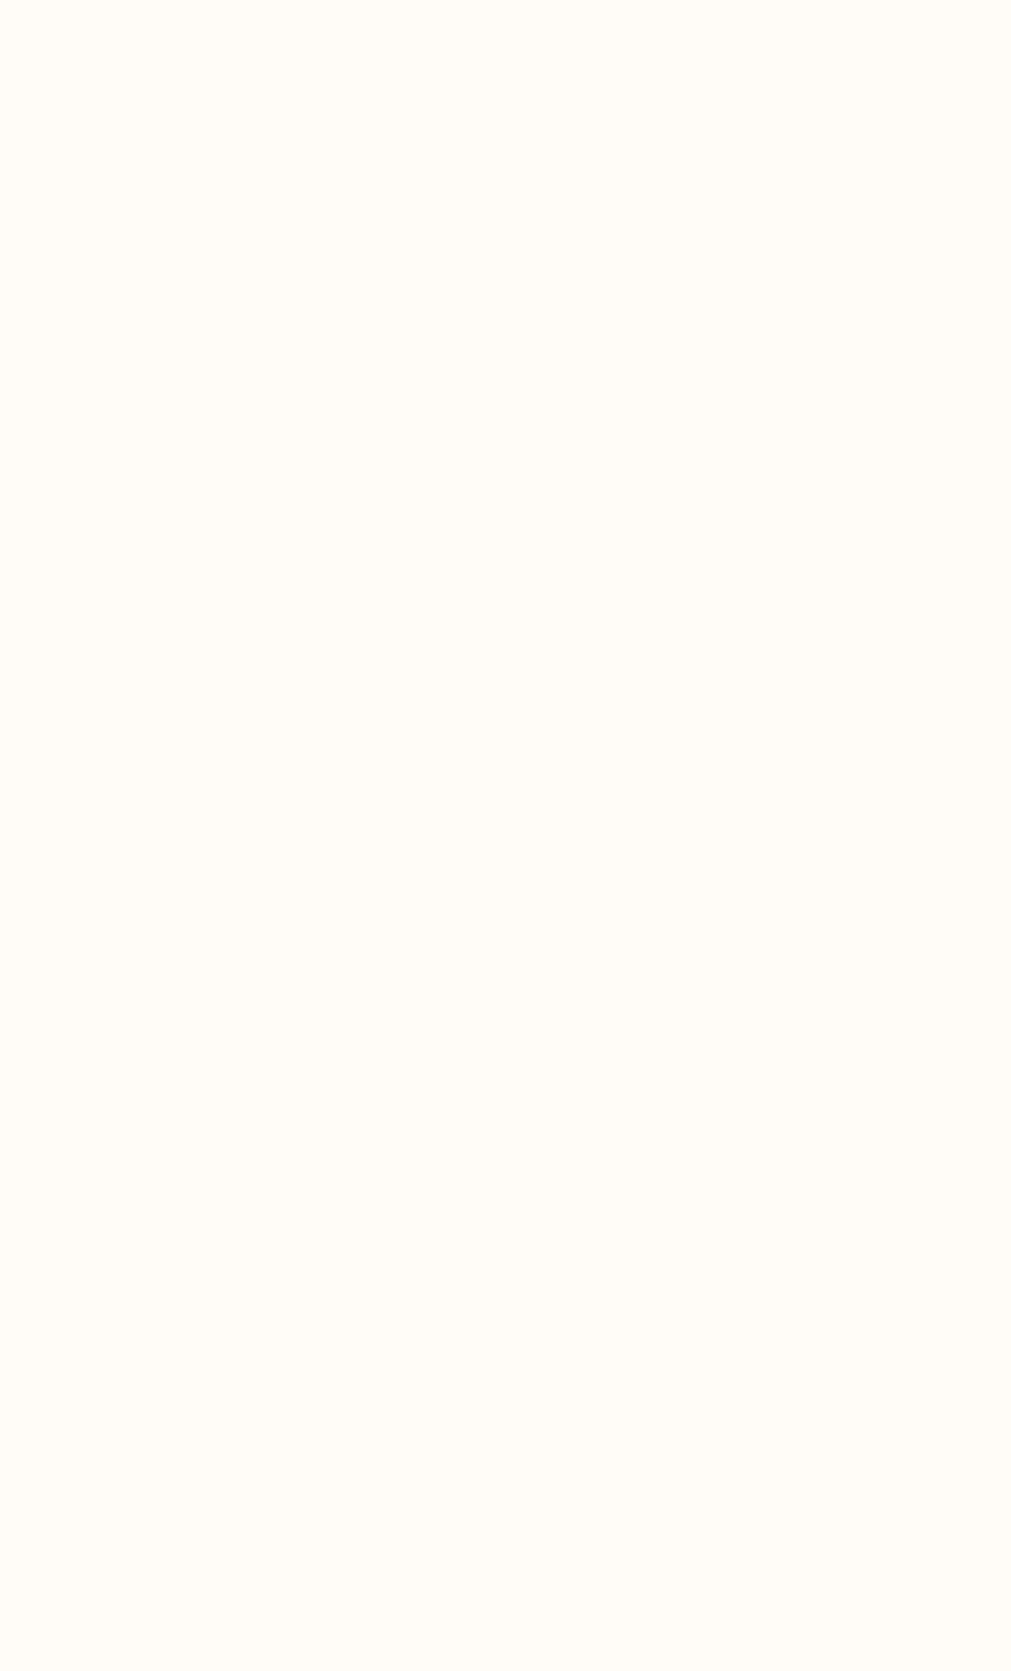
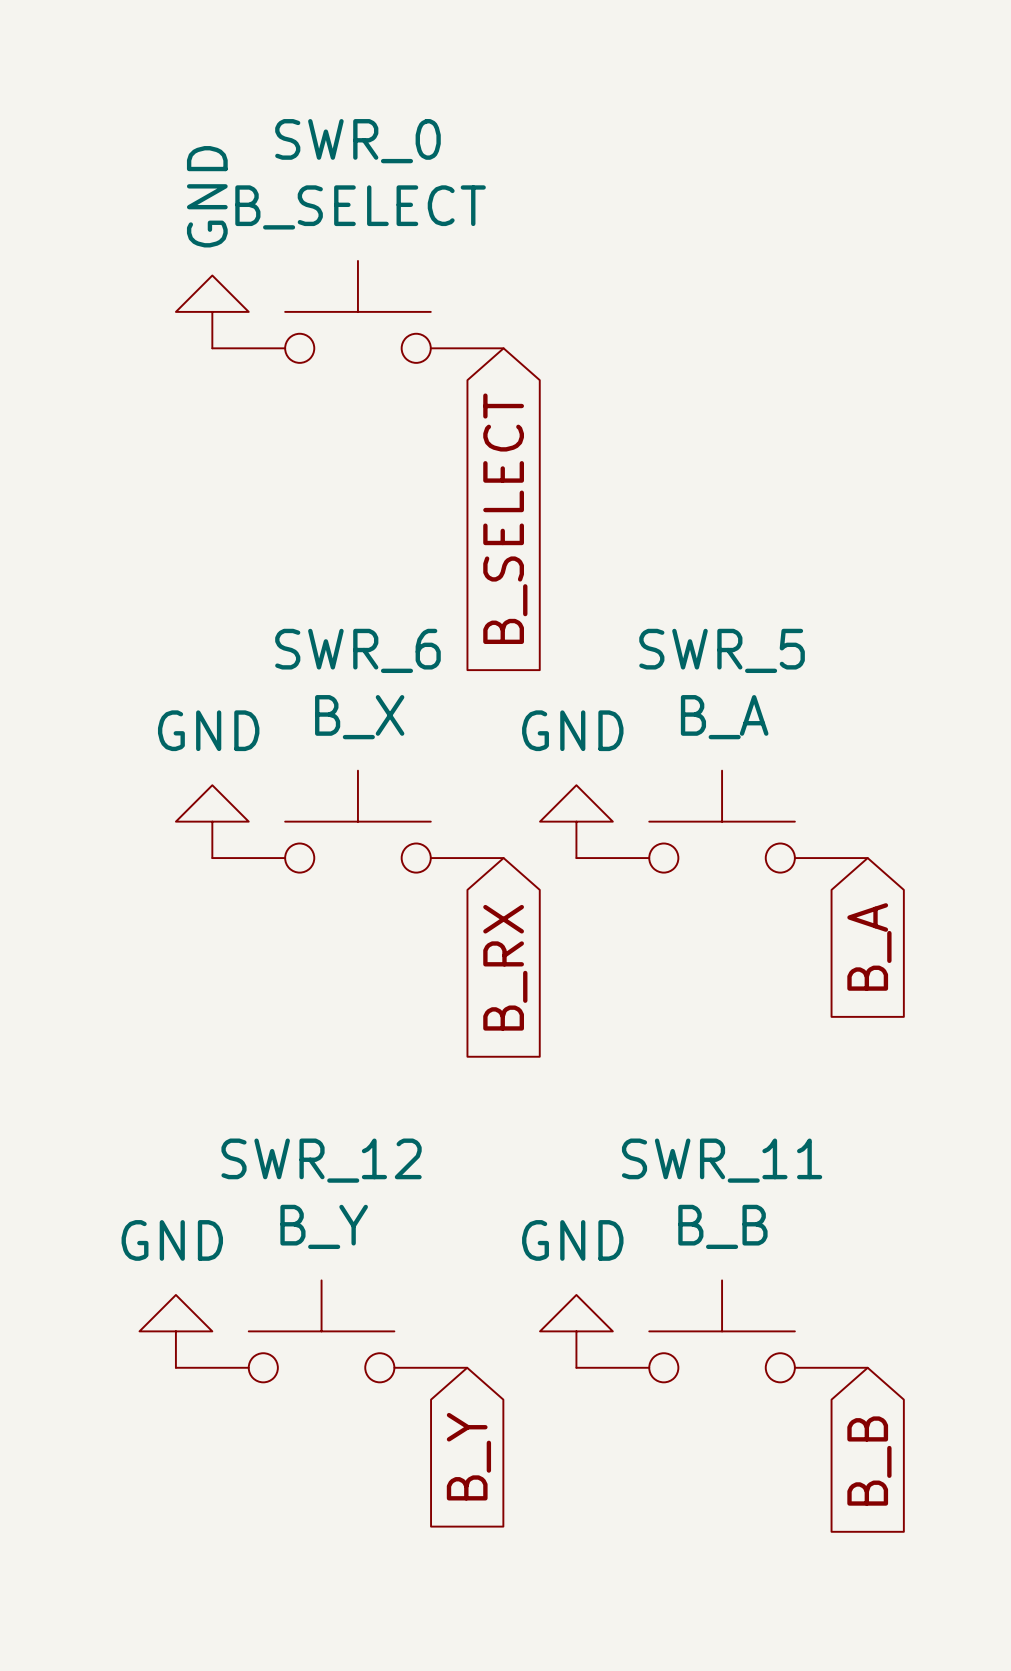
power symbol: none -> GND (212, 311)
SWR_0: none -> B_SELECT (357, 311)
global label: none -> B_SELECT (505, 518)
power symbol: none -> GND (212, 821)
SWR_6: none -> B_X (357, 821)
power symbol: none -> GND (576, 821)
SWR_5: none -> B_A (722, 821)
global label: none -> B_A (869, 946)
global label: none -> B_RX (505, 967)
power symbol: none -> GND (175, 1331)
SWR_12: none -> B_Y (321, 1331)
power symbol: none -> GND (576, 1331)
SWR_11: none -> B_B (722, 1331)
global label: none -> B_Y (468, 1456)
global label: none -> B_B (869, 1461)

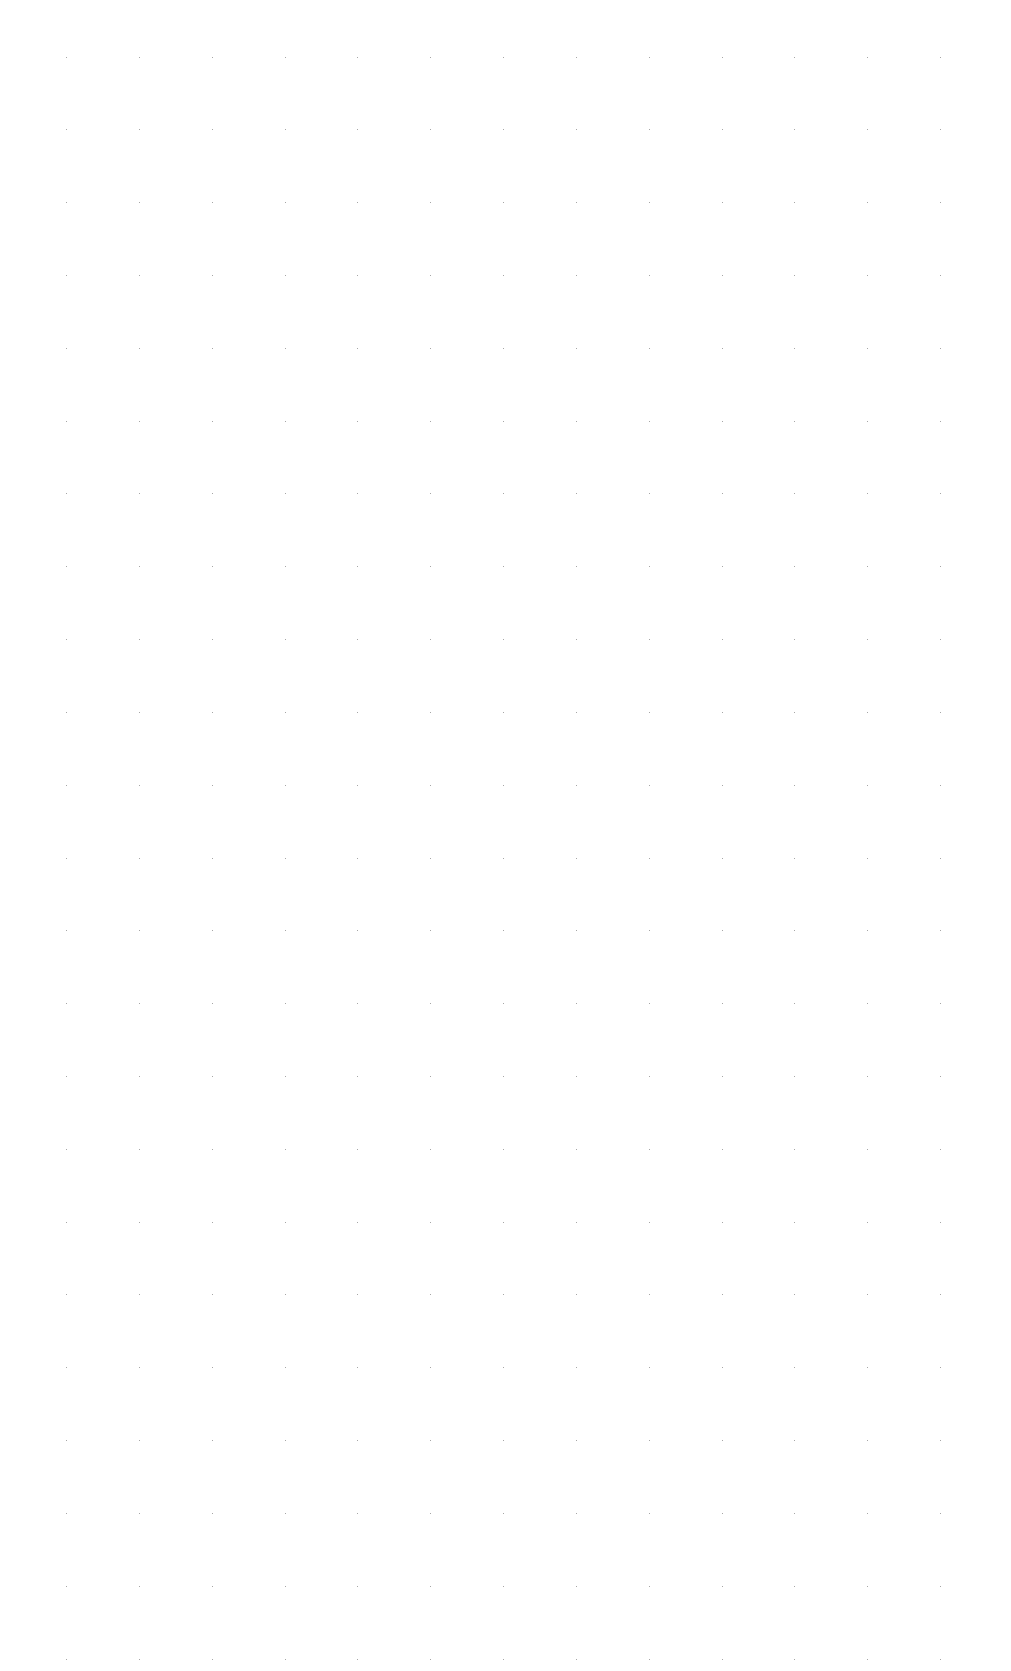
power symbol: GND (212, 311) -> none
SWR_0: B_SELECT (357, 311) -> none
global label: B_SELECT (505, 518) -> none
power symbol: GND (212, 821) -> none
SWR_6: B_X (357, 821) -> none
power symbol: GND (576, 821) -> none
SWR_5: B_A (722, 821) -> none
global label: B_A (869, 946) -> none
global label: B_RX (505, 967) -> none
power symbol: GND (175, 1331) -> none
SWR_12: B_Y (321, 1331) -> none
power symbol: GND (576, 1331) -> none
SWR_11: B_B (722, 1331) -> none
global label: B_Y (468, 1456) -> none
global label: B_B (869, 1461) -> none

